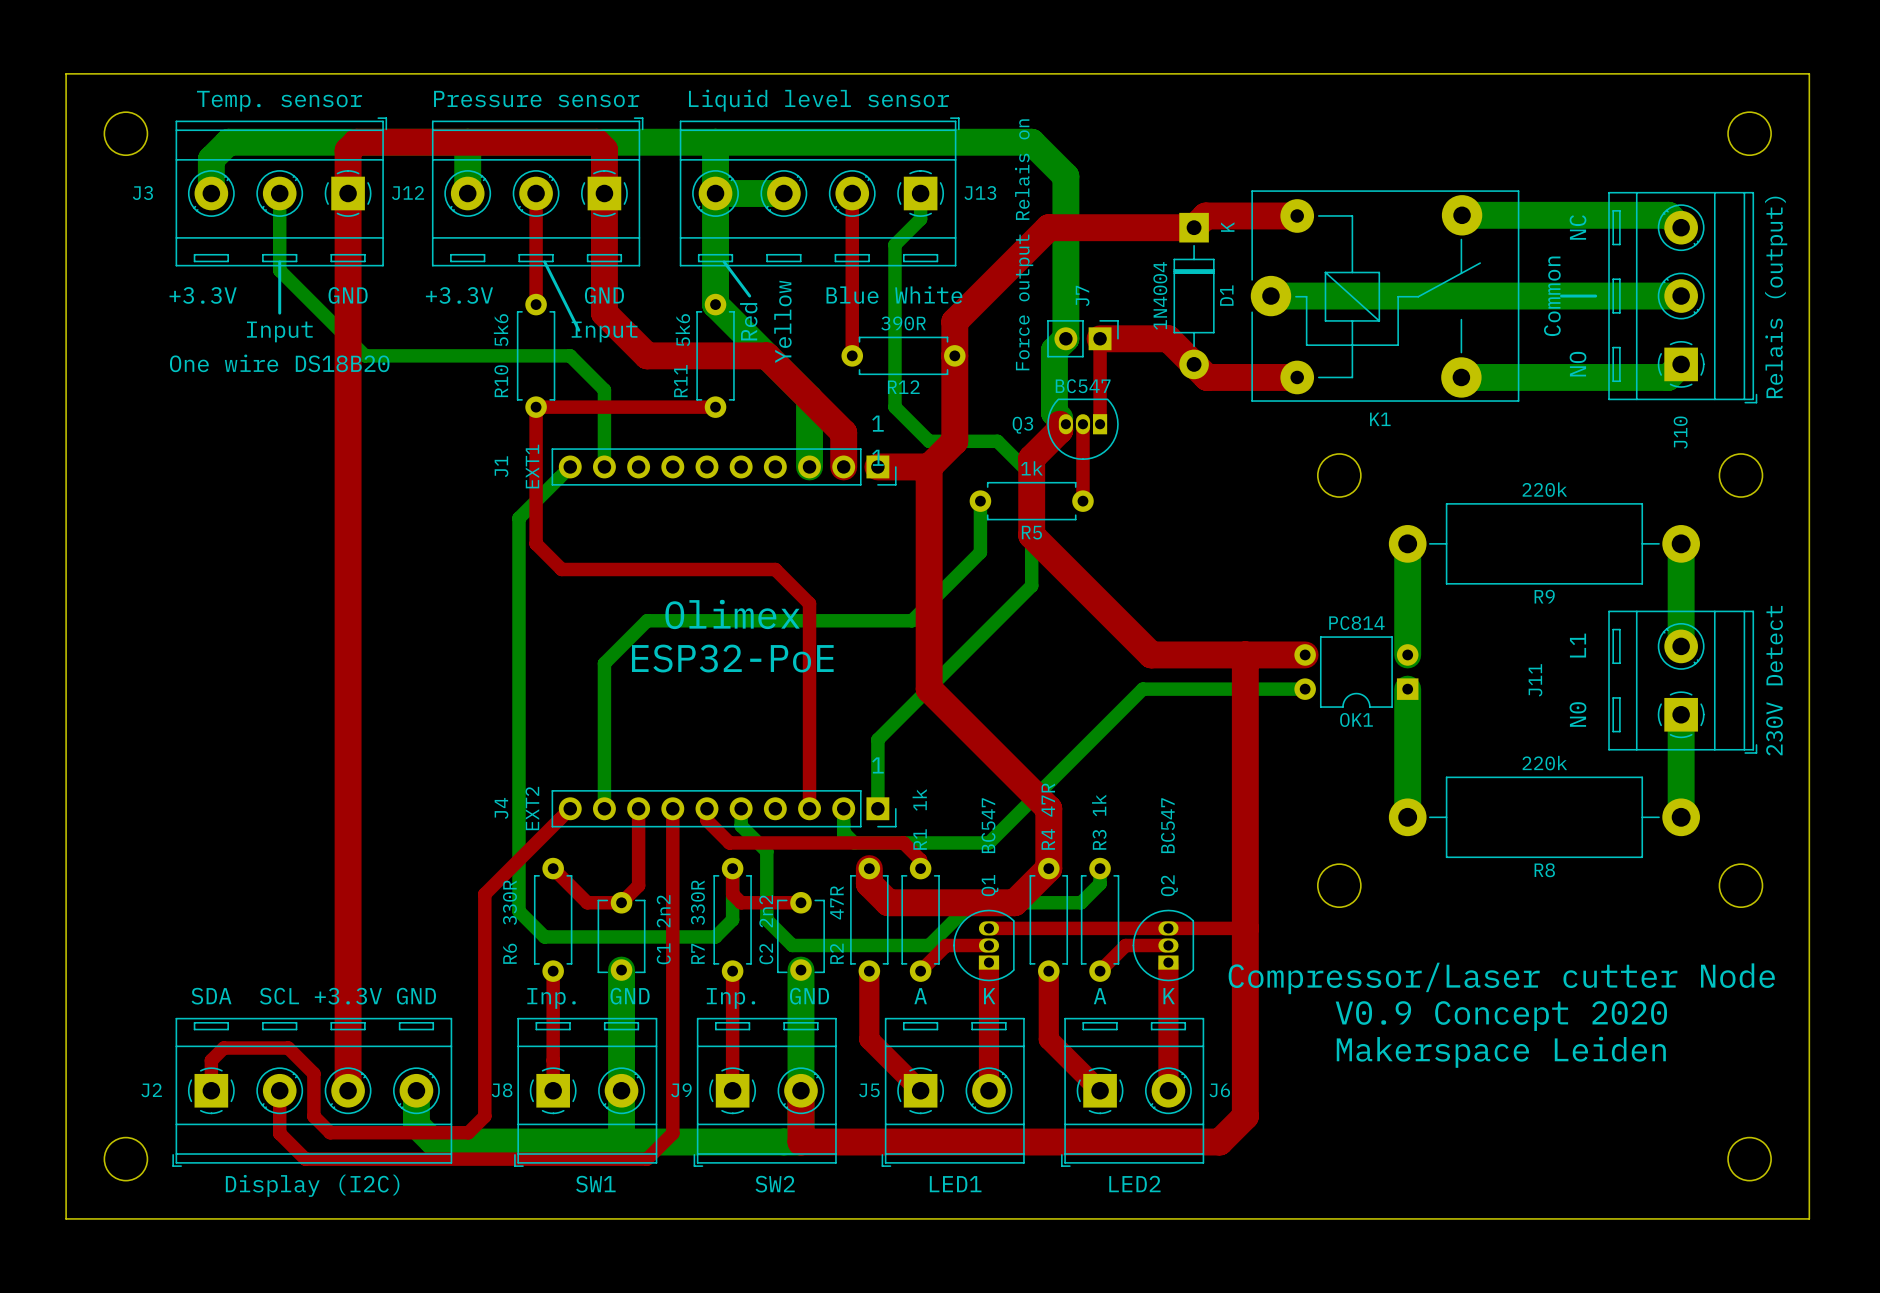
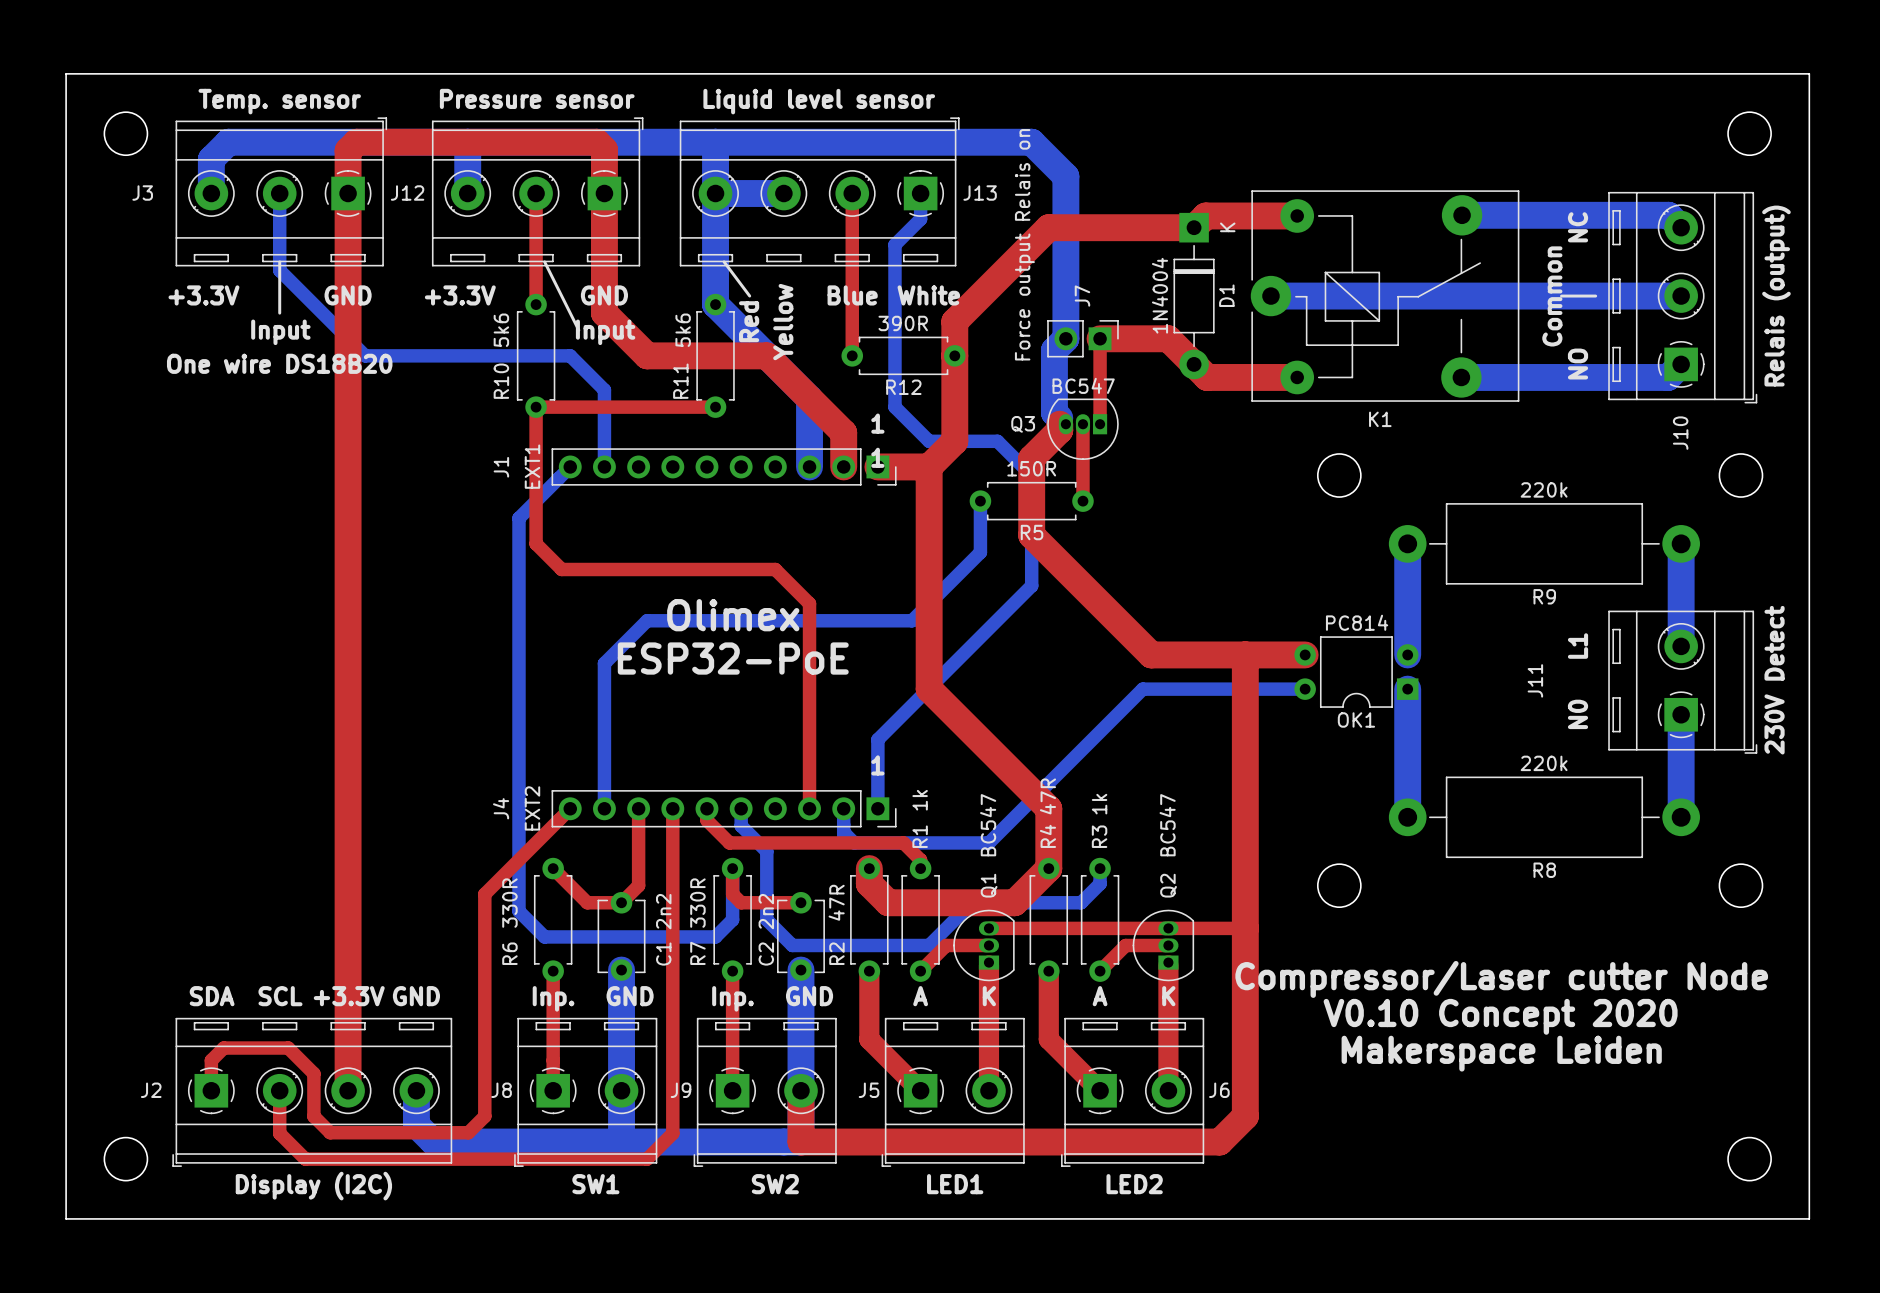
R5 value: 1k (1031, 468) -> 150R (1031, 468)
text: V0.9 Concept 2020 (1501, 1016) -> V0.10 Concept 2020 (1500, 1016)

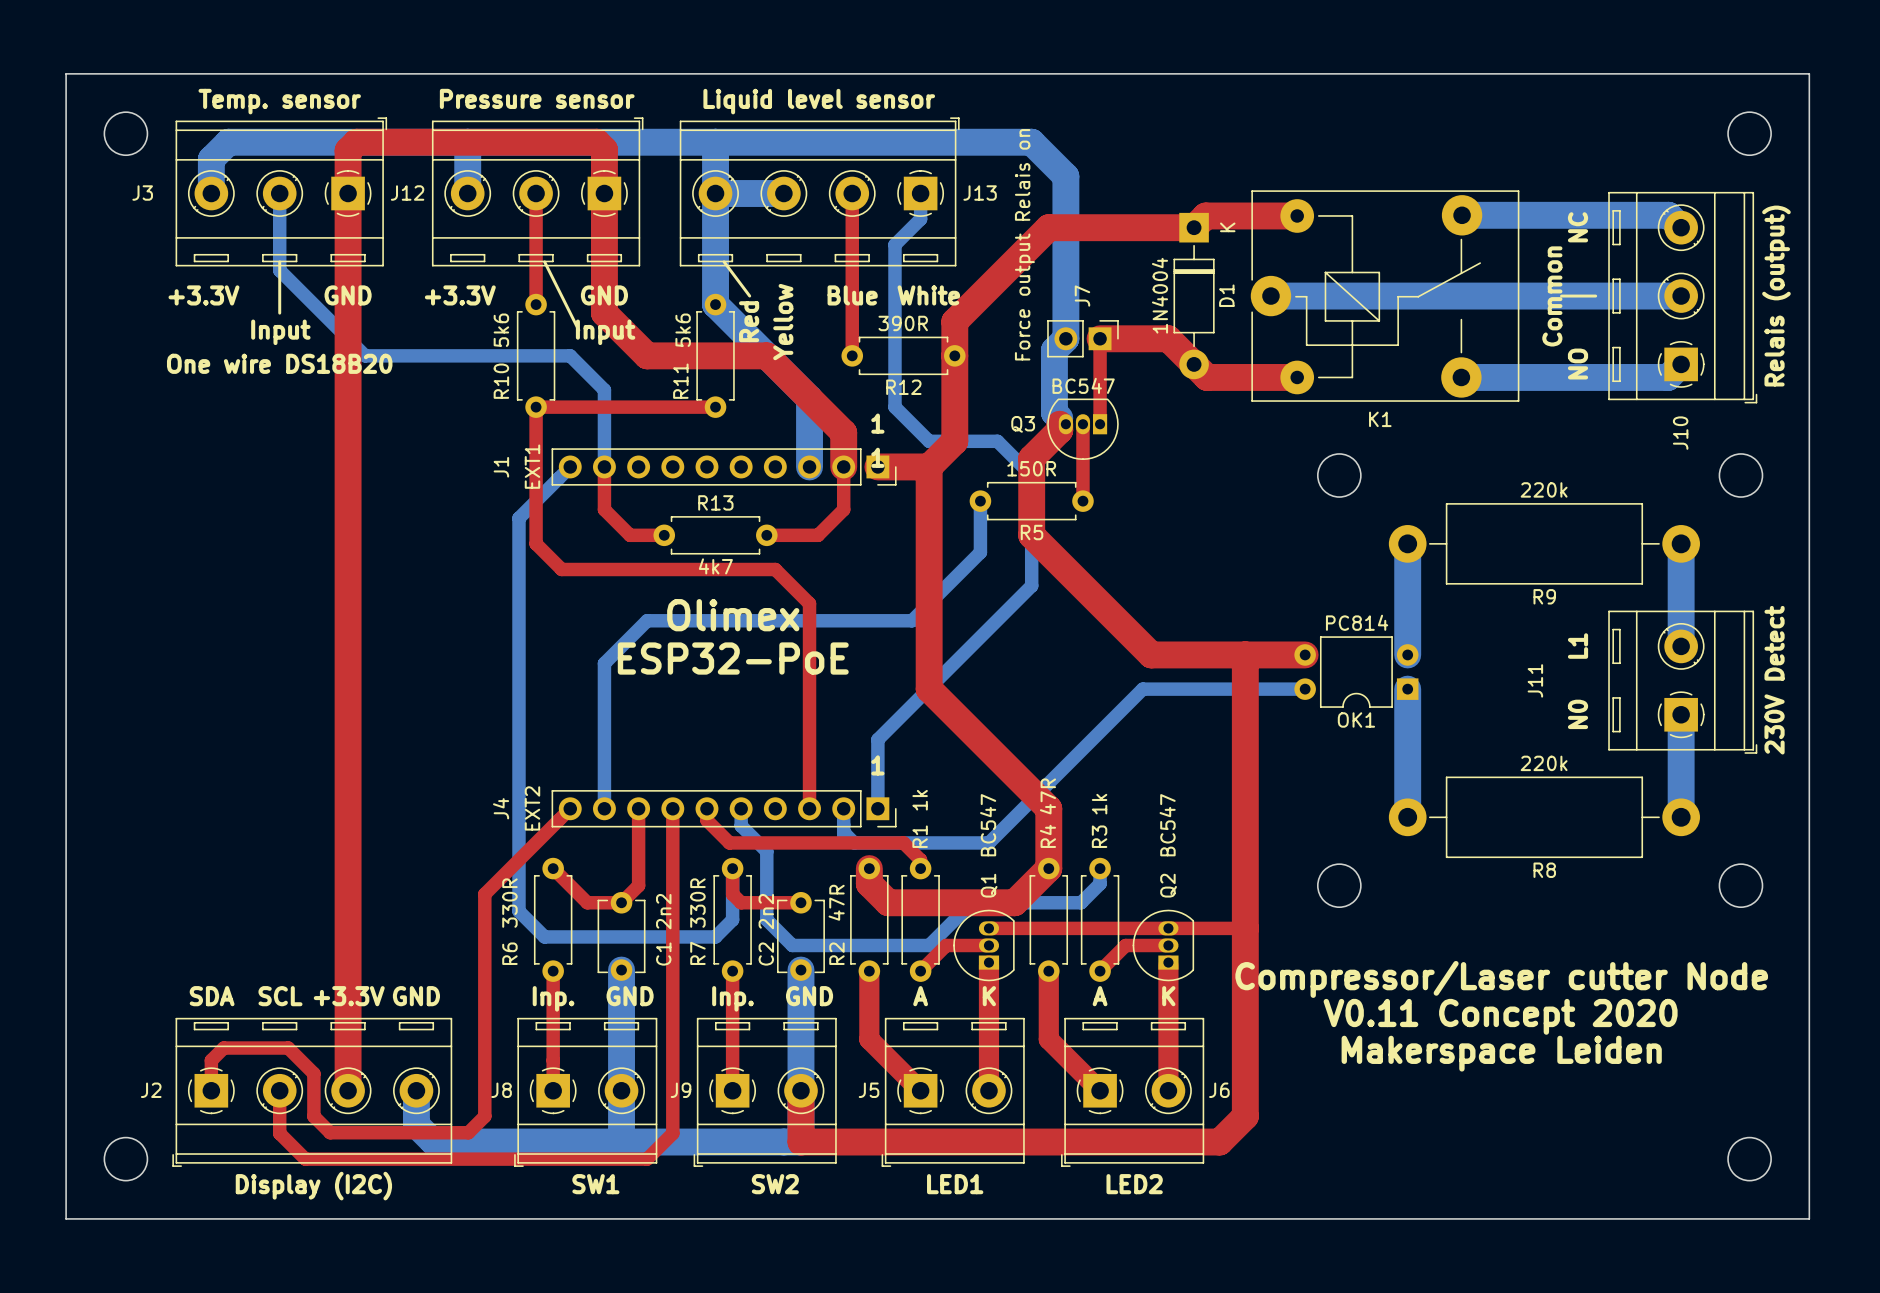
top track: none -> (604, 466) (604, 509) (630, 535) (664, 535)
top track: none -> (843, 466) (843, 509) (818, 535) (766, 535)
R13: none -> 4k7 (715, 535)
text: V0.10 Concept 2020 (1500, 1016) -> V0.11 Concept 2020 (1500, 1016)

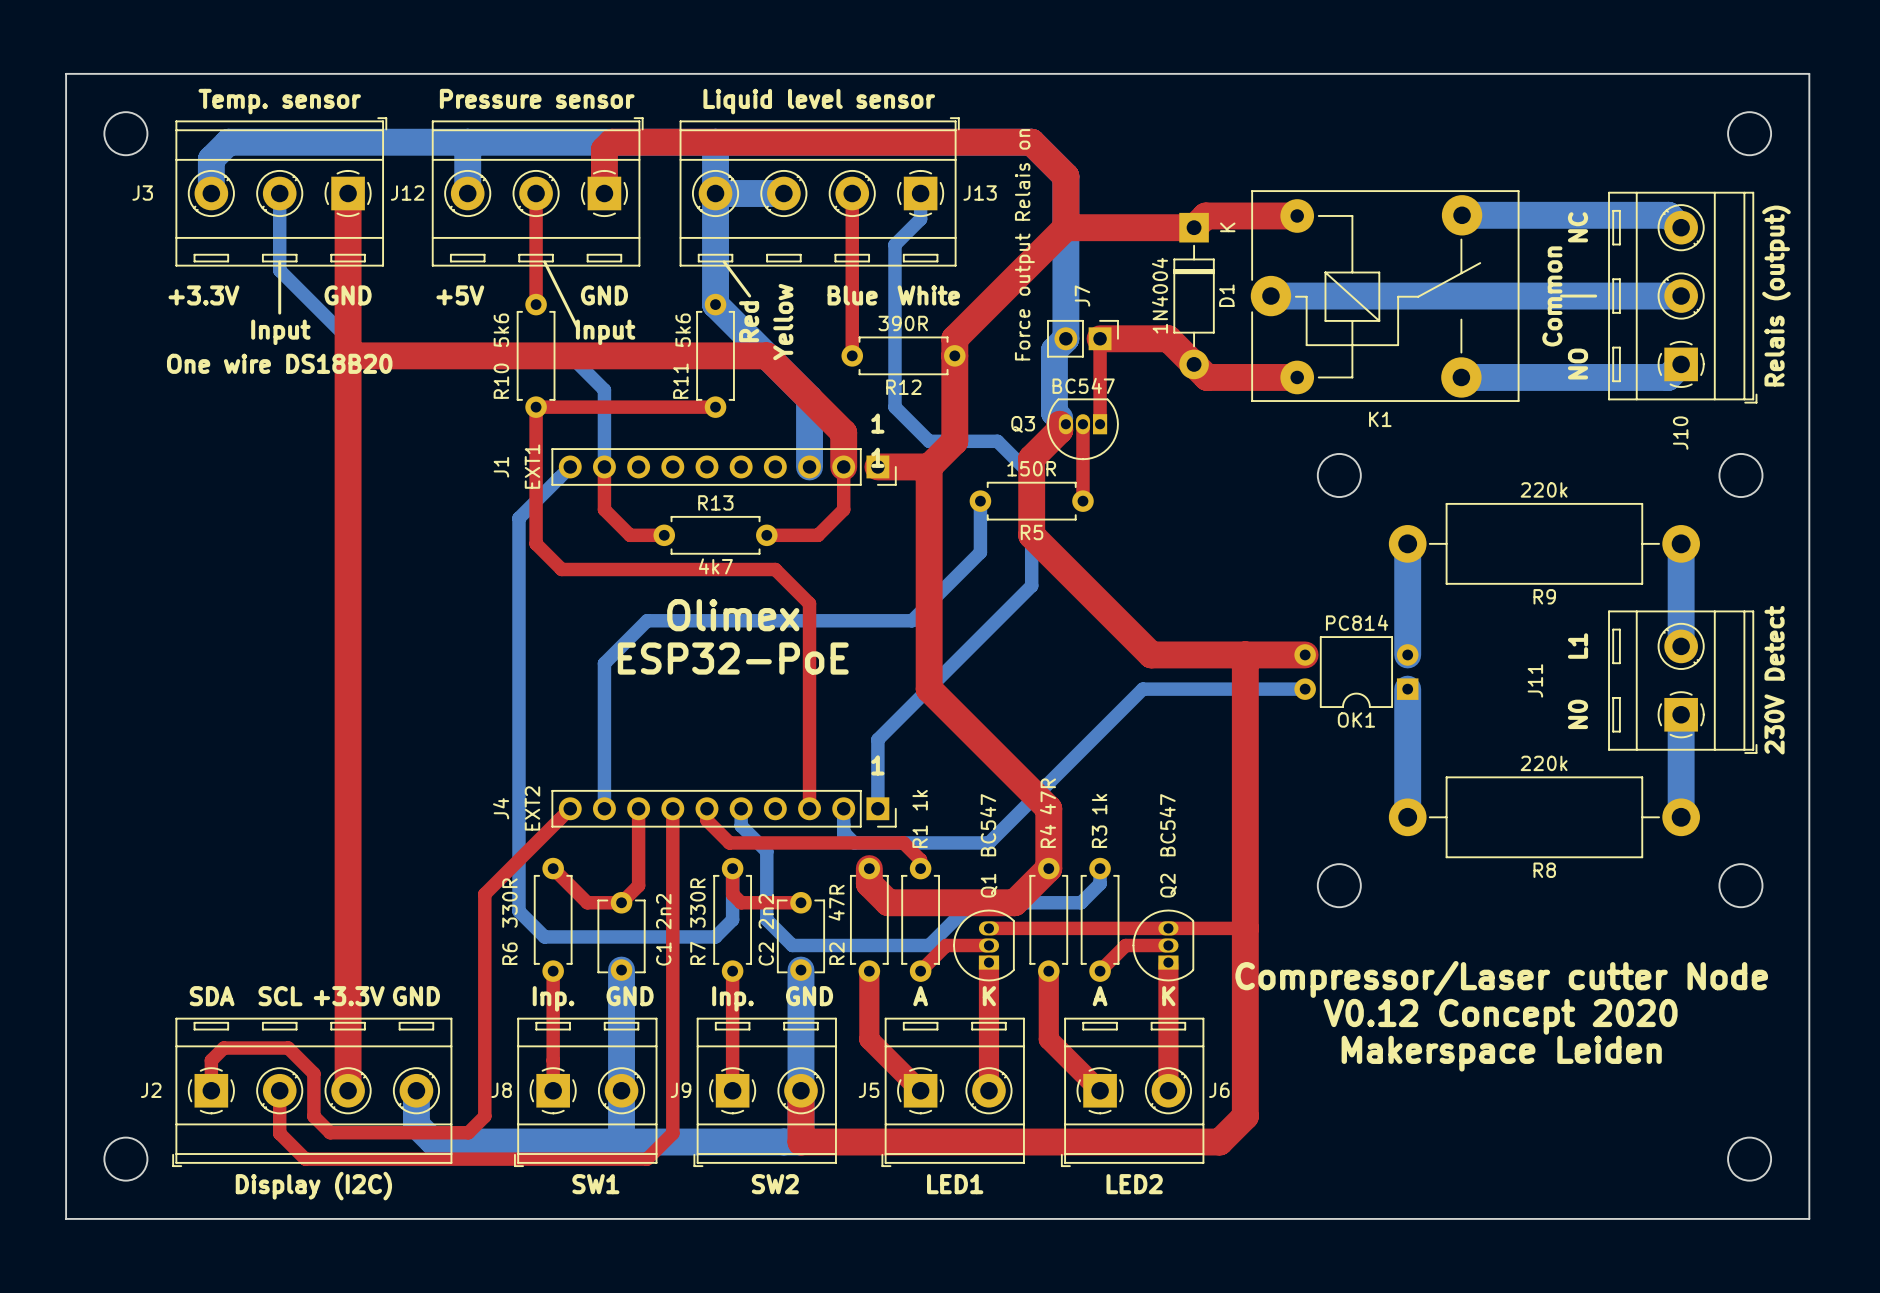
top track: (604, 149) (596, 142) (356, 142) (348, 150) (348, 193) -> none
top track: (604, 193) (604, 313) (647, 355) -> (348, 355) (647, 355)
top track: (1065, 227) (1048, 227) (954, 321) (954, 338) -> (604, 149) (611, 142) (1031, 142) (1065, 176) (1065, 227) (954, 338)
text: +3.3V (460, 295) -> +5V (460, 295)
text: V0.11 Concept 2020 (1500, 1016) -> V0.12 Concept 2020 (1500, 1016)

